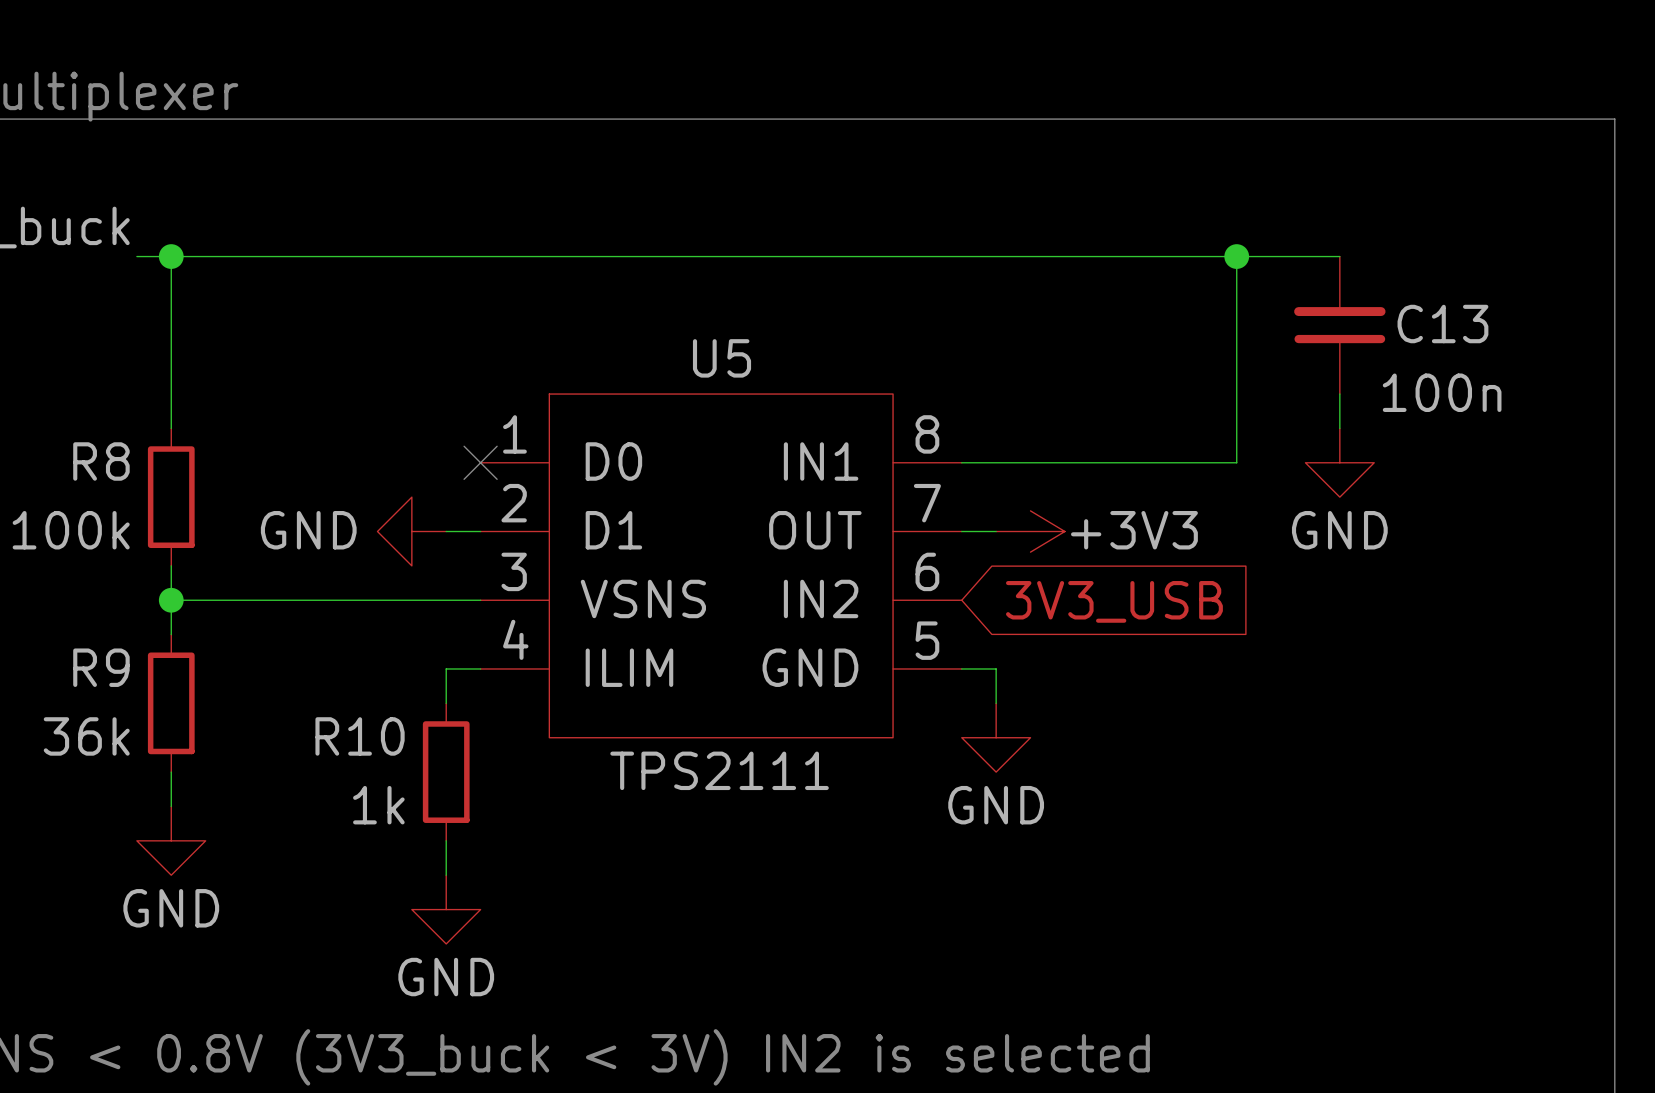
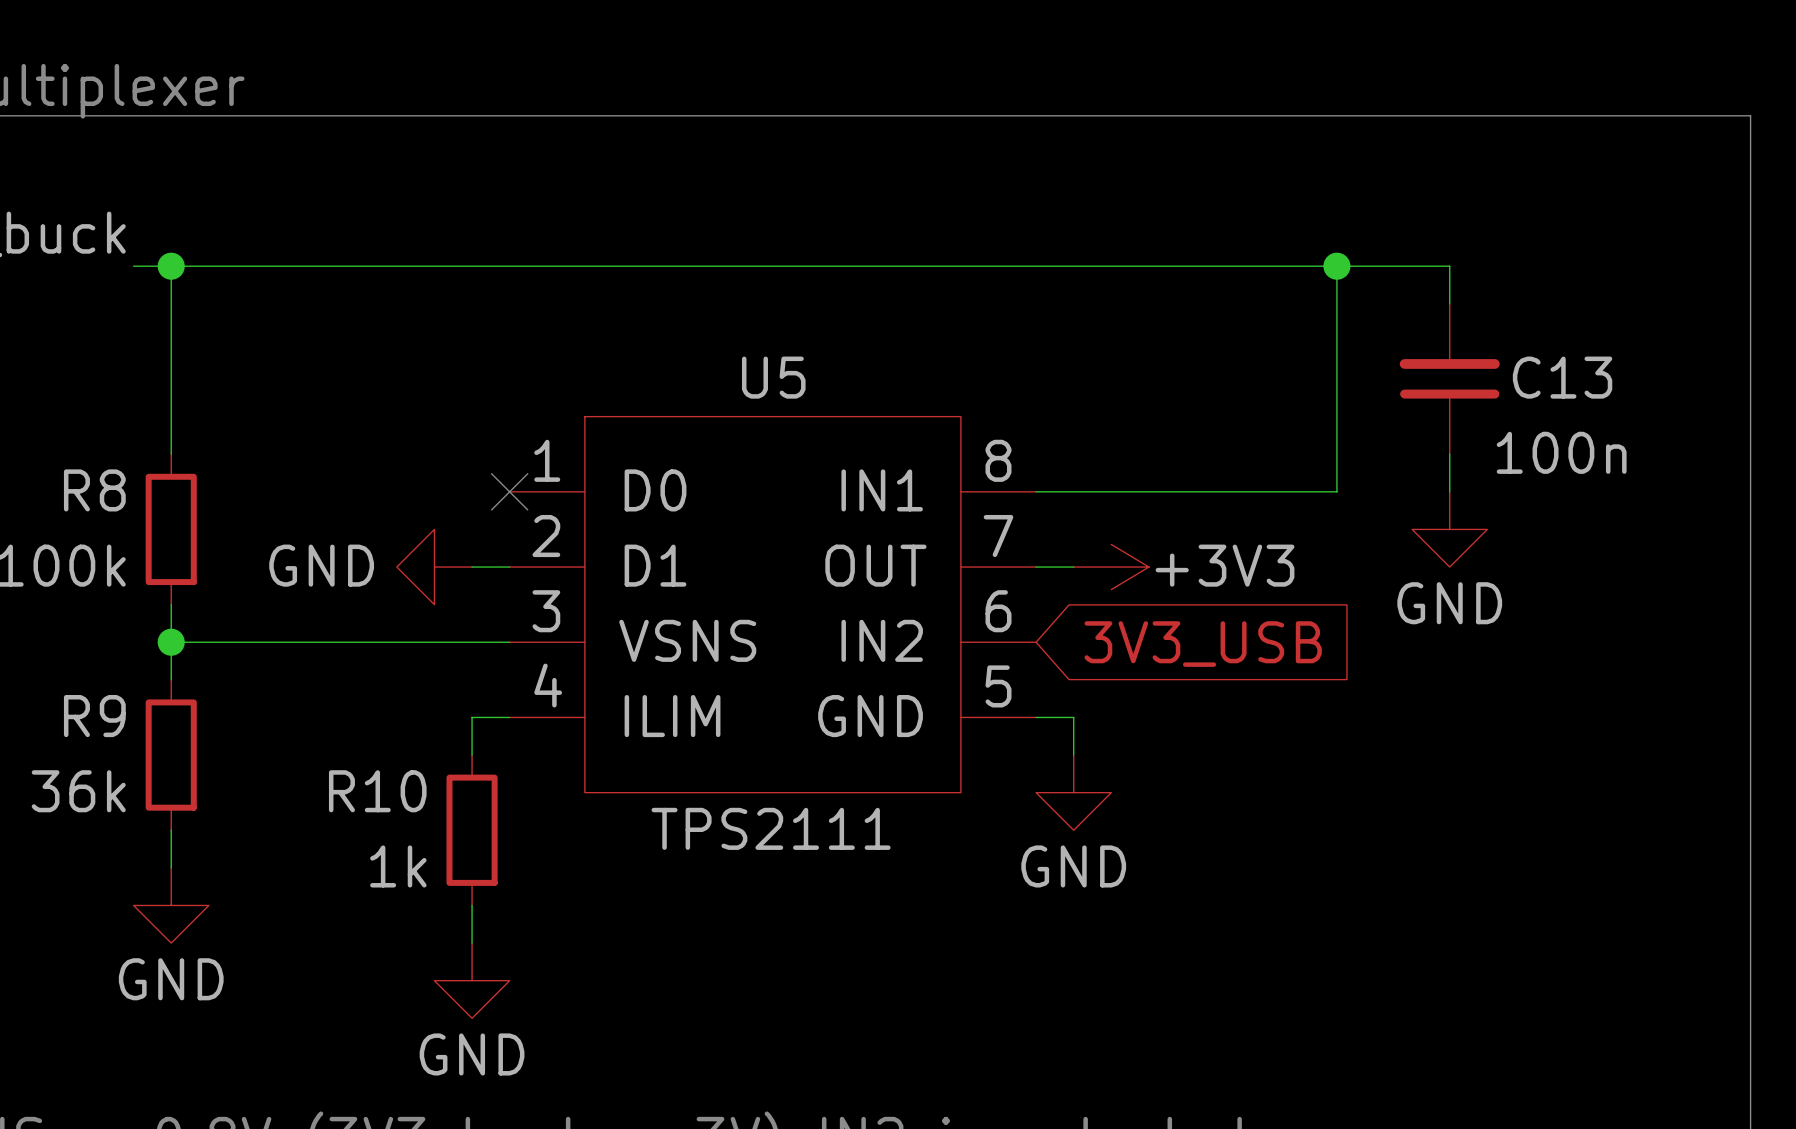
C13 position: (1339, 325) -> (1449, 379)
power symbol position: GND (1339, 462) -> GND (1449, 529)

